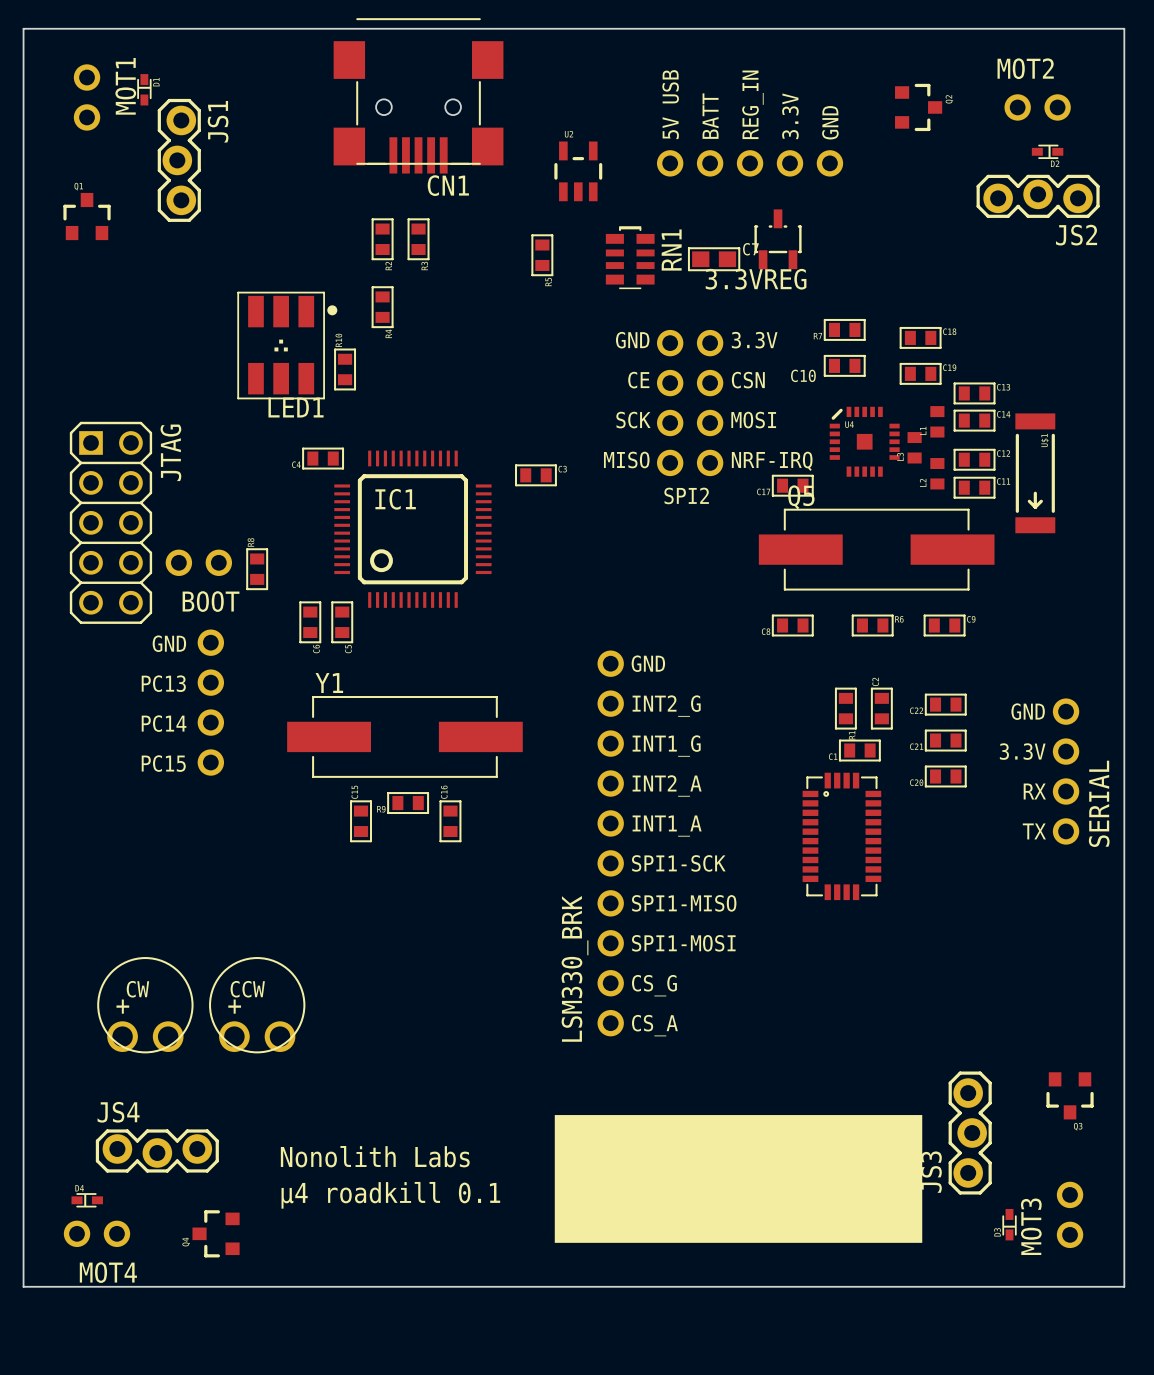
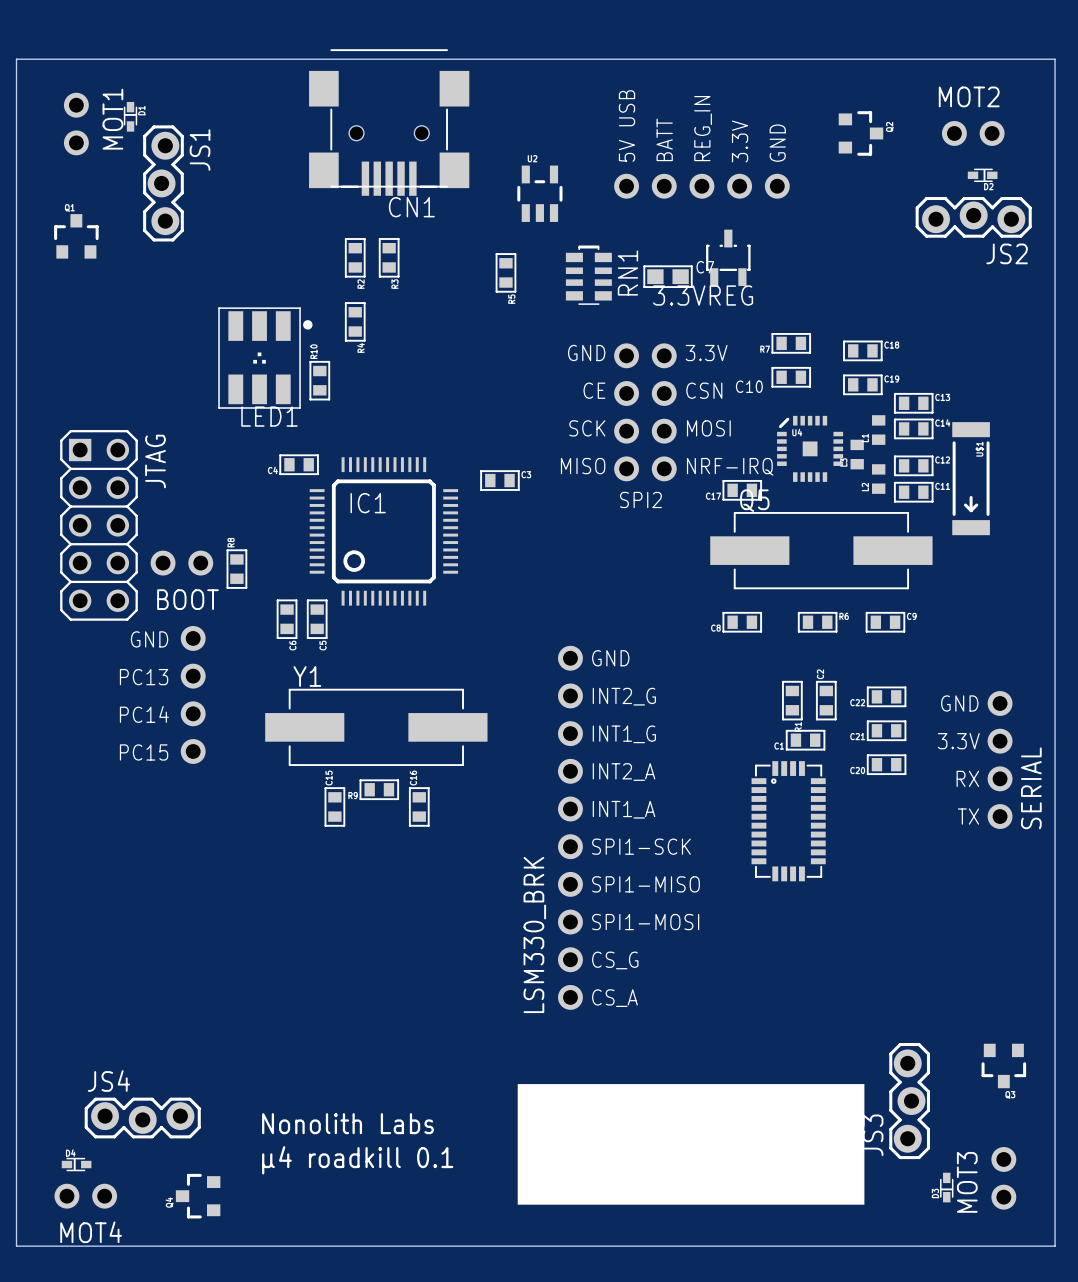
part: (145, 1005) -> none
part: (257, 1005) -> none

